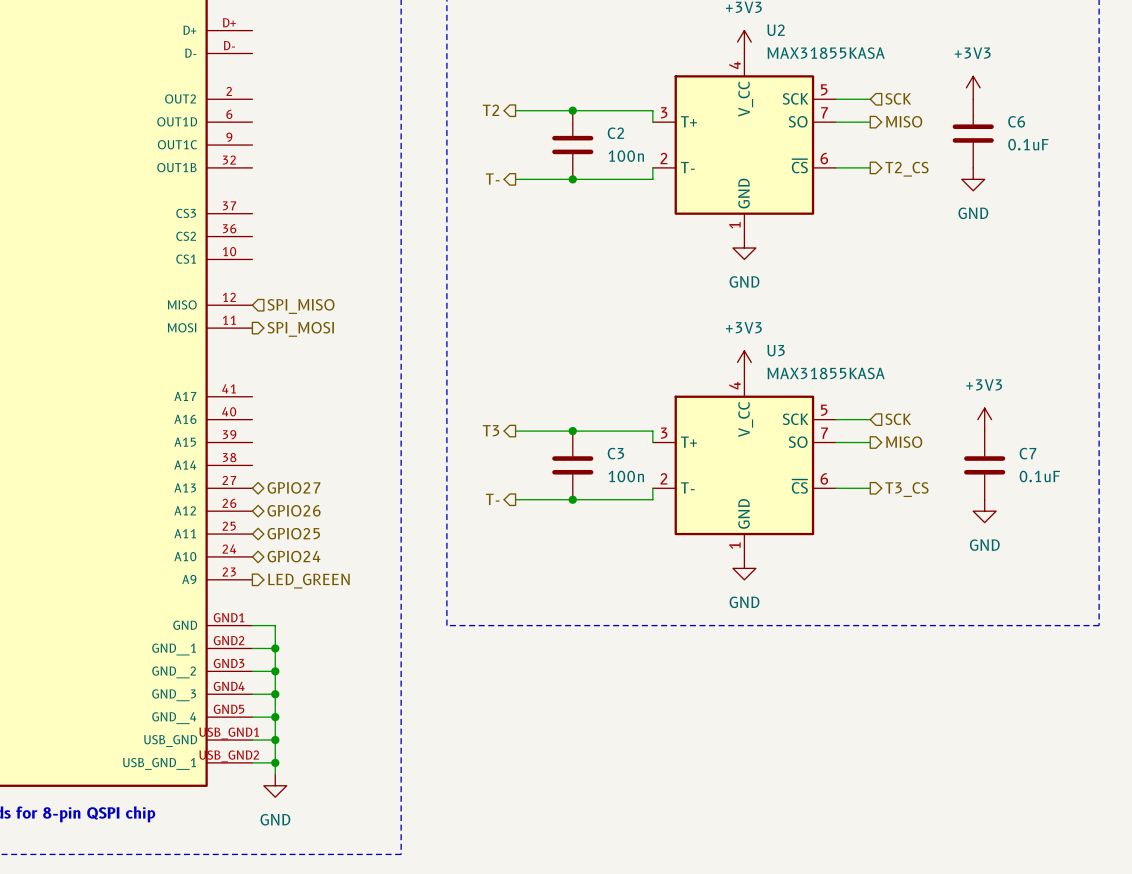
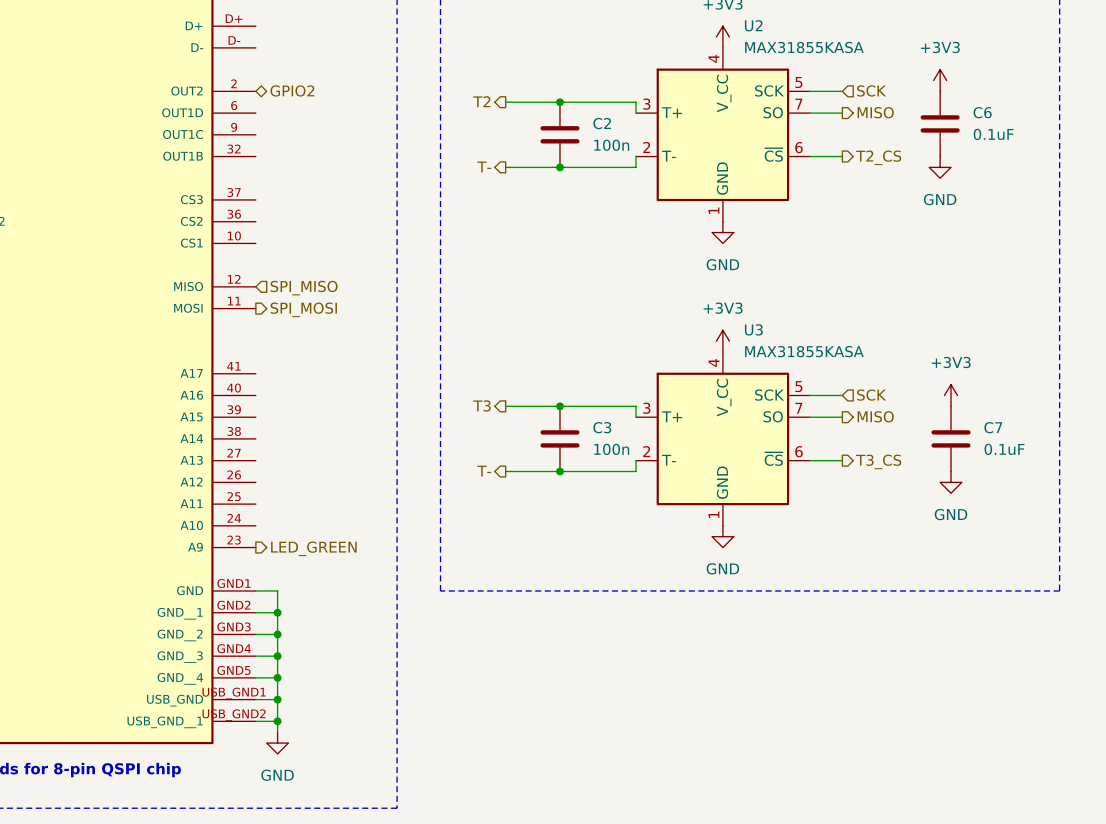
hierarchical label: none -> GPIO2 (292, 90)
hierarchical label: GPIO27 (293, 487) -> none
hierarchical label: GPIO26 (294, 510) -> none
hierarchical label: GPIO25 (293, 533) -> none
hierarchical label: GPIO24 (293, 556) -> none

